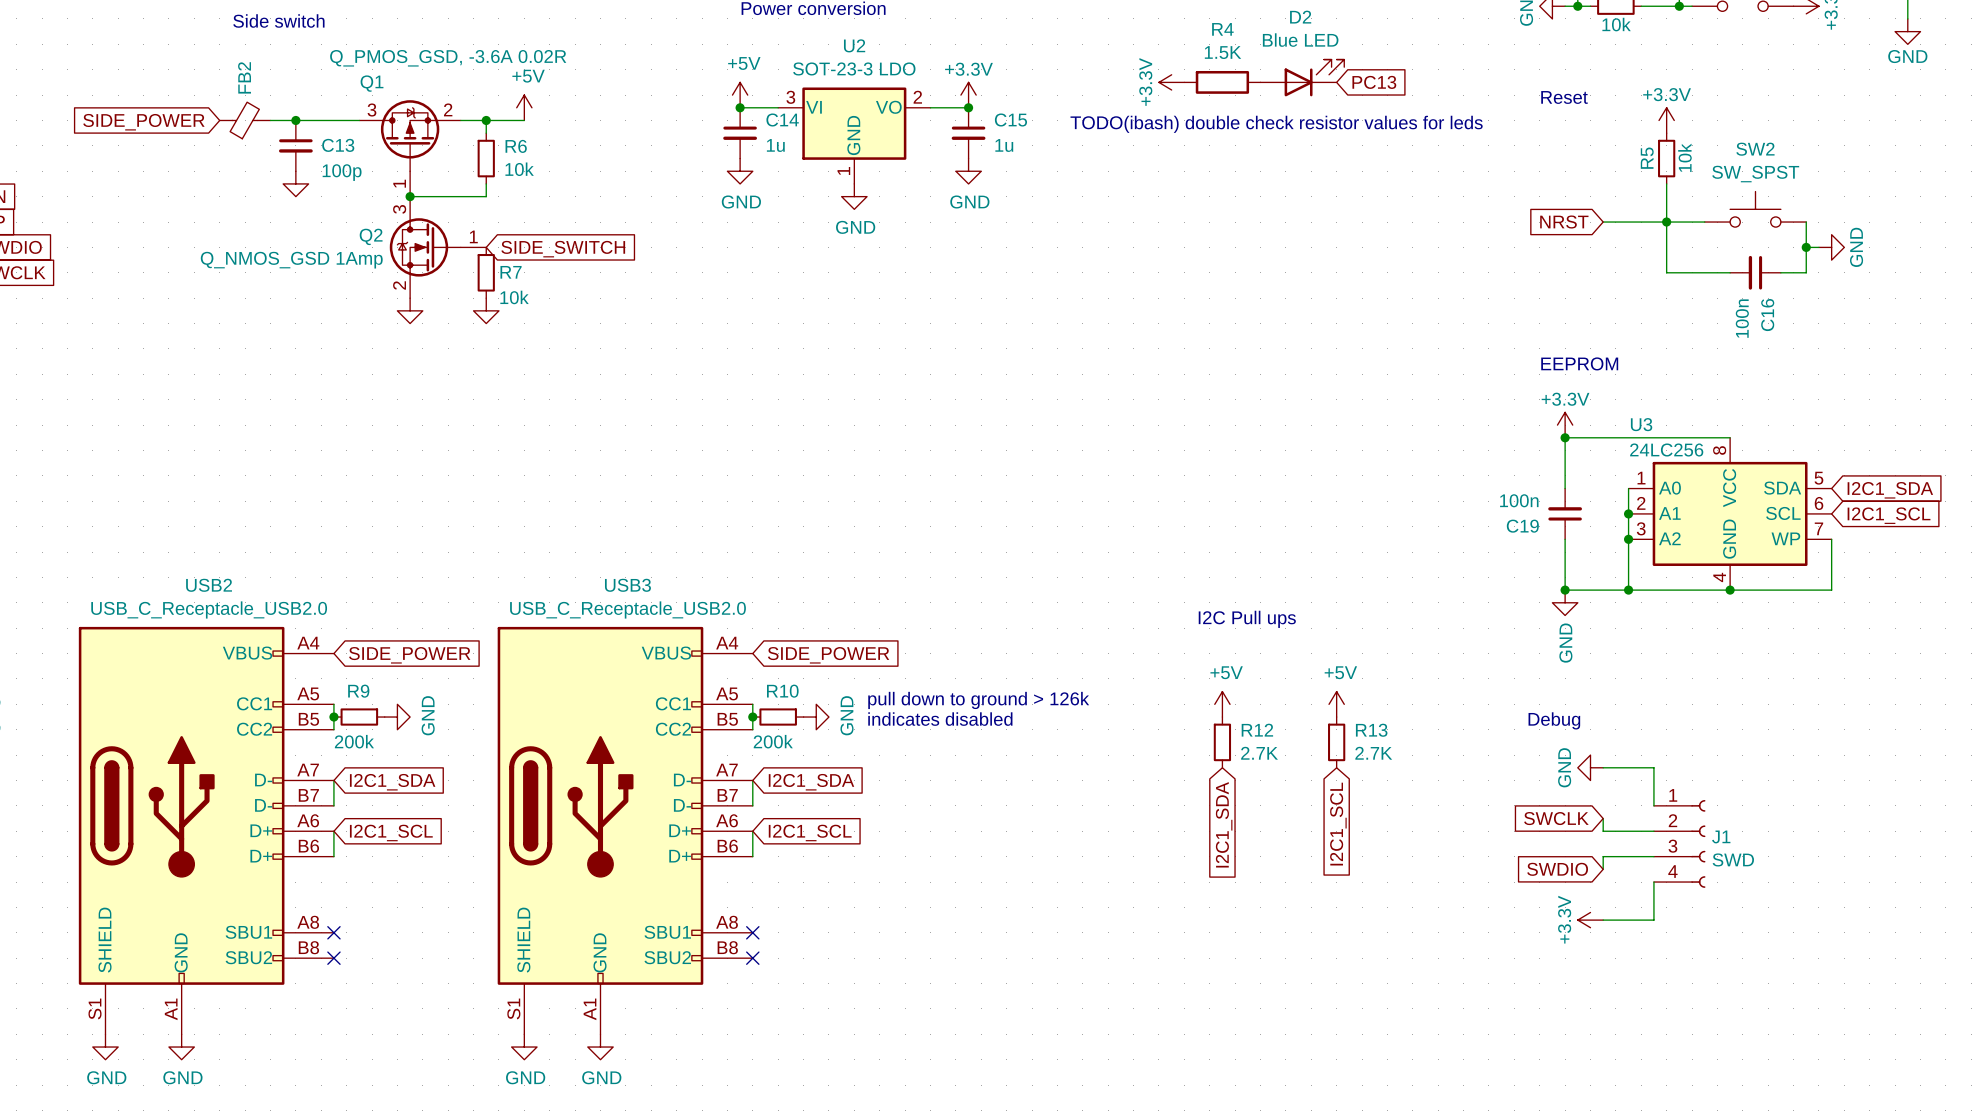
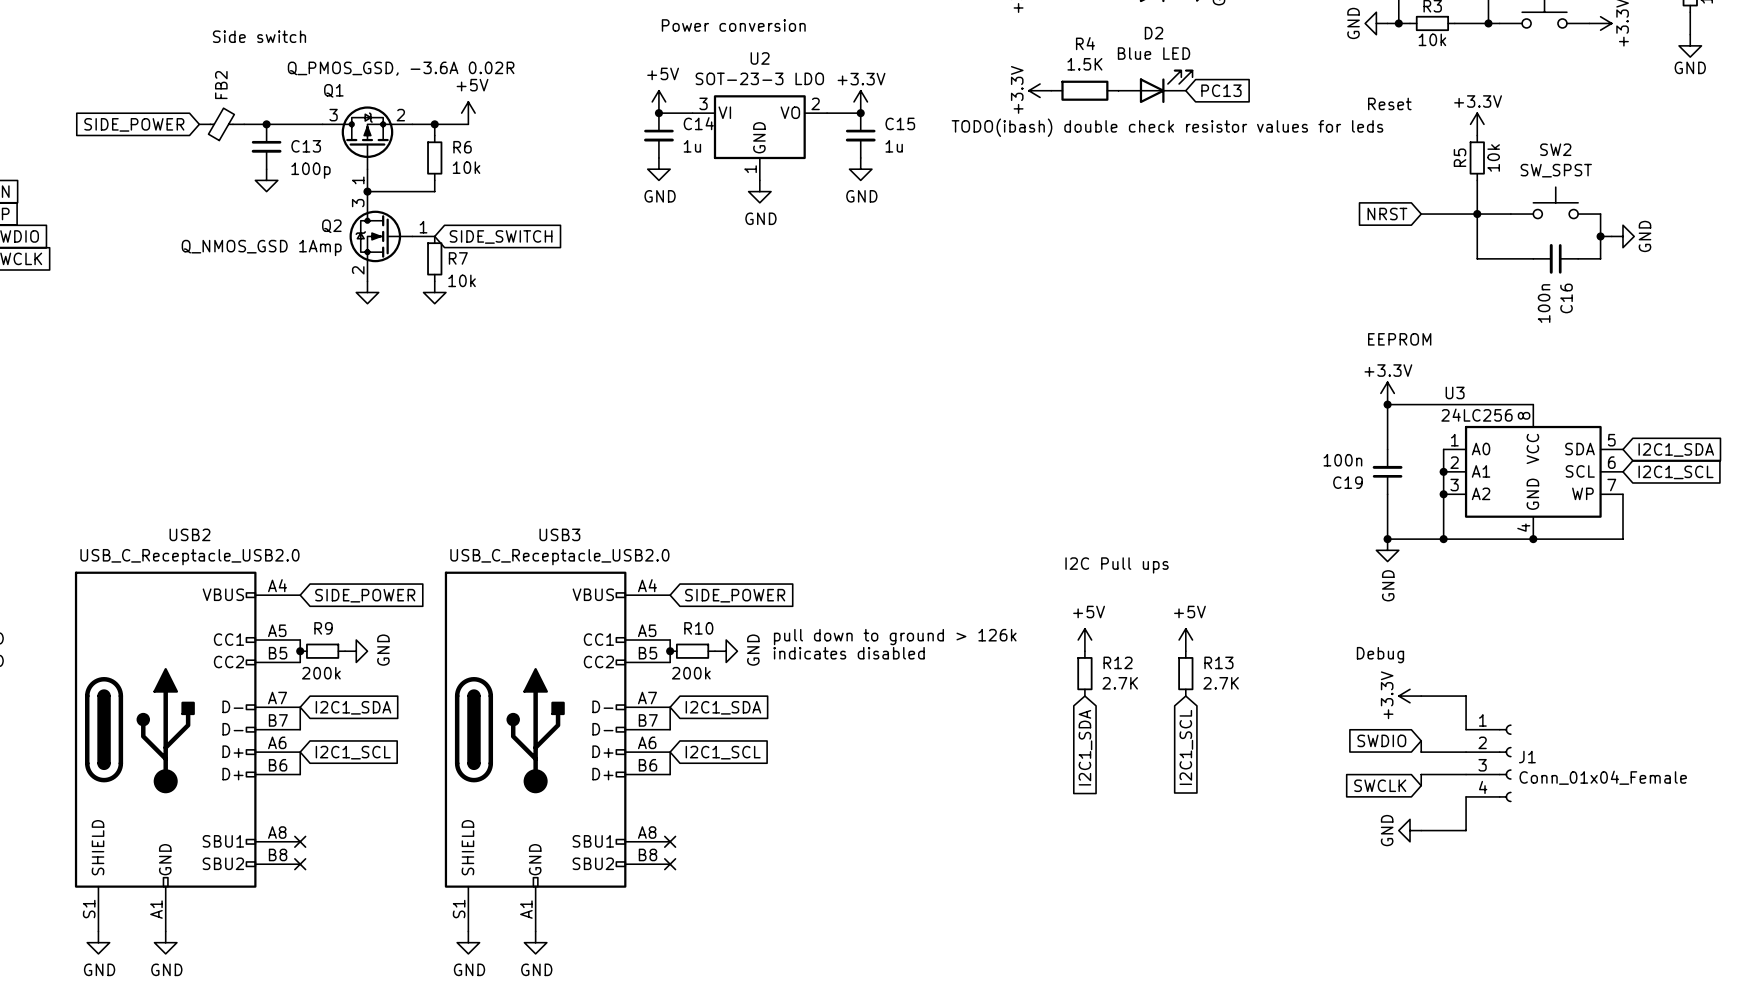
power symbol: GND (1590, 767) -> +3.3V (1410, 696)
global label: SWCLK (1556, 818) -> SWDIO (1381, 740)
J1 value: SWD (1733, 859) -> Conn_01x04_Female (1603, 777)
global label: SWDIO (1557, 869) -> SWCLK (1380, 785)
power symbol: +3.3V (1590, 920) -> GND (1410, 830)

